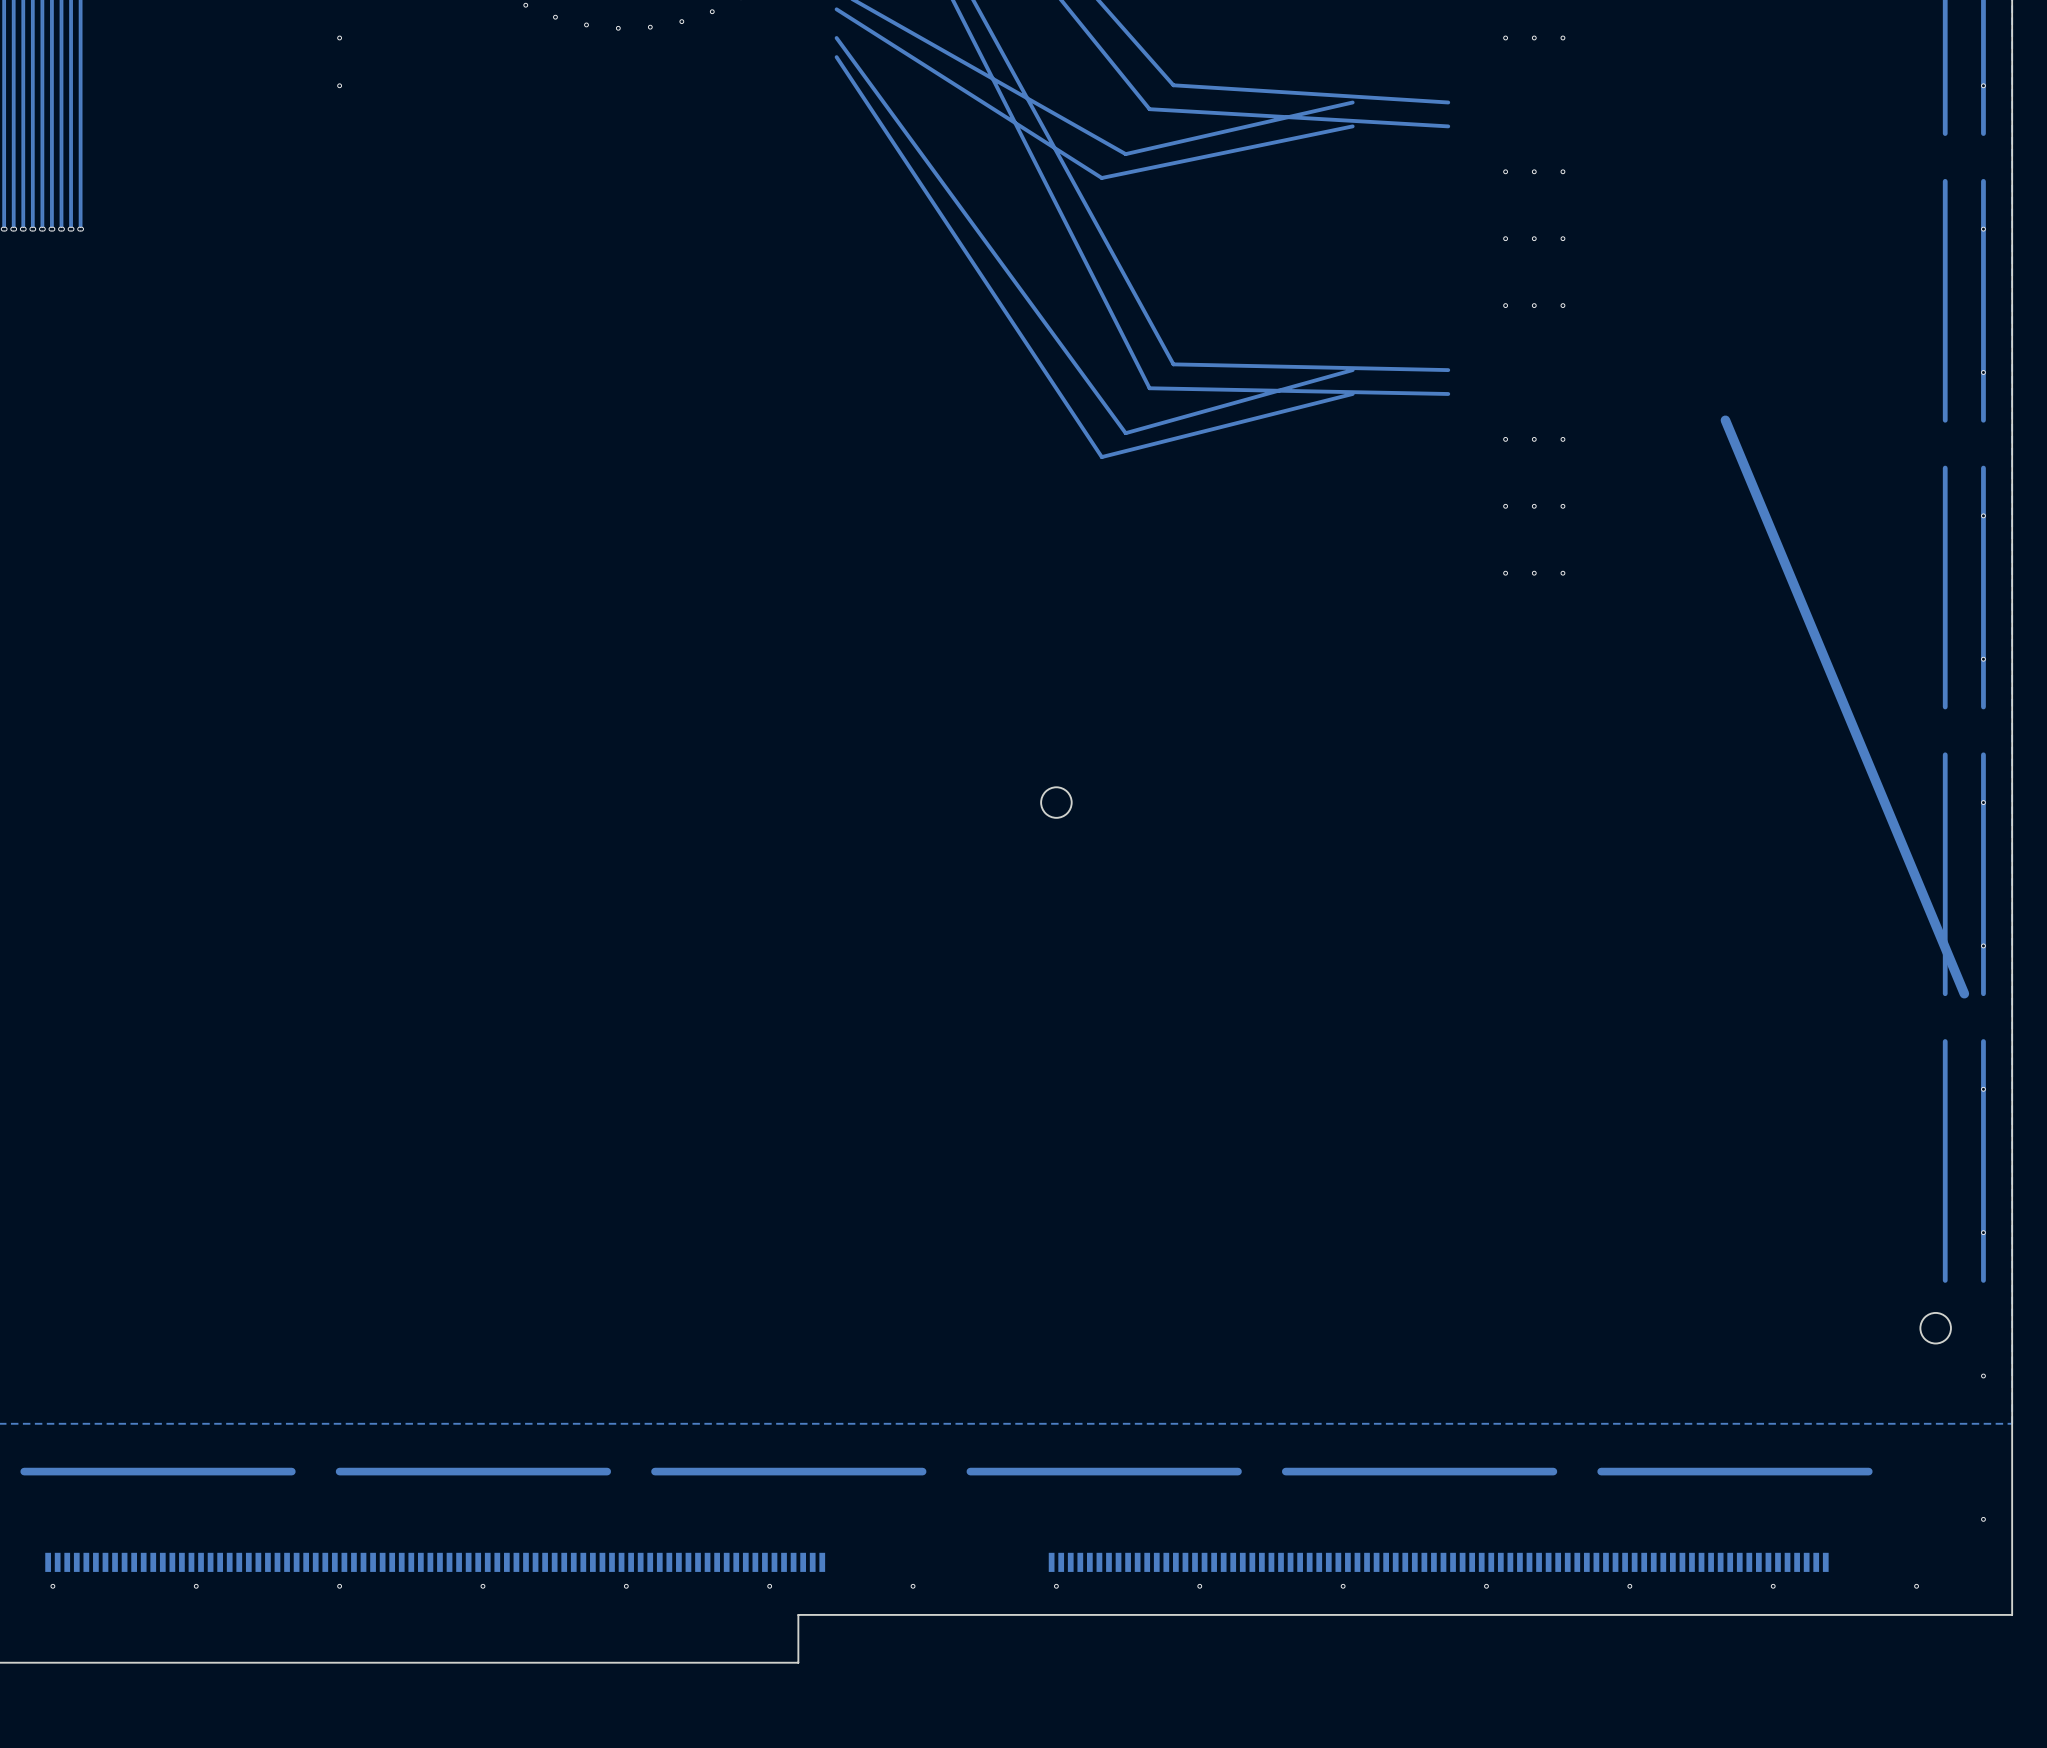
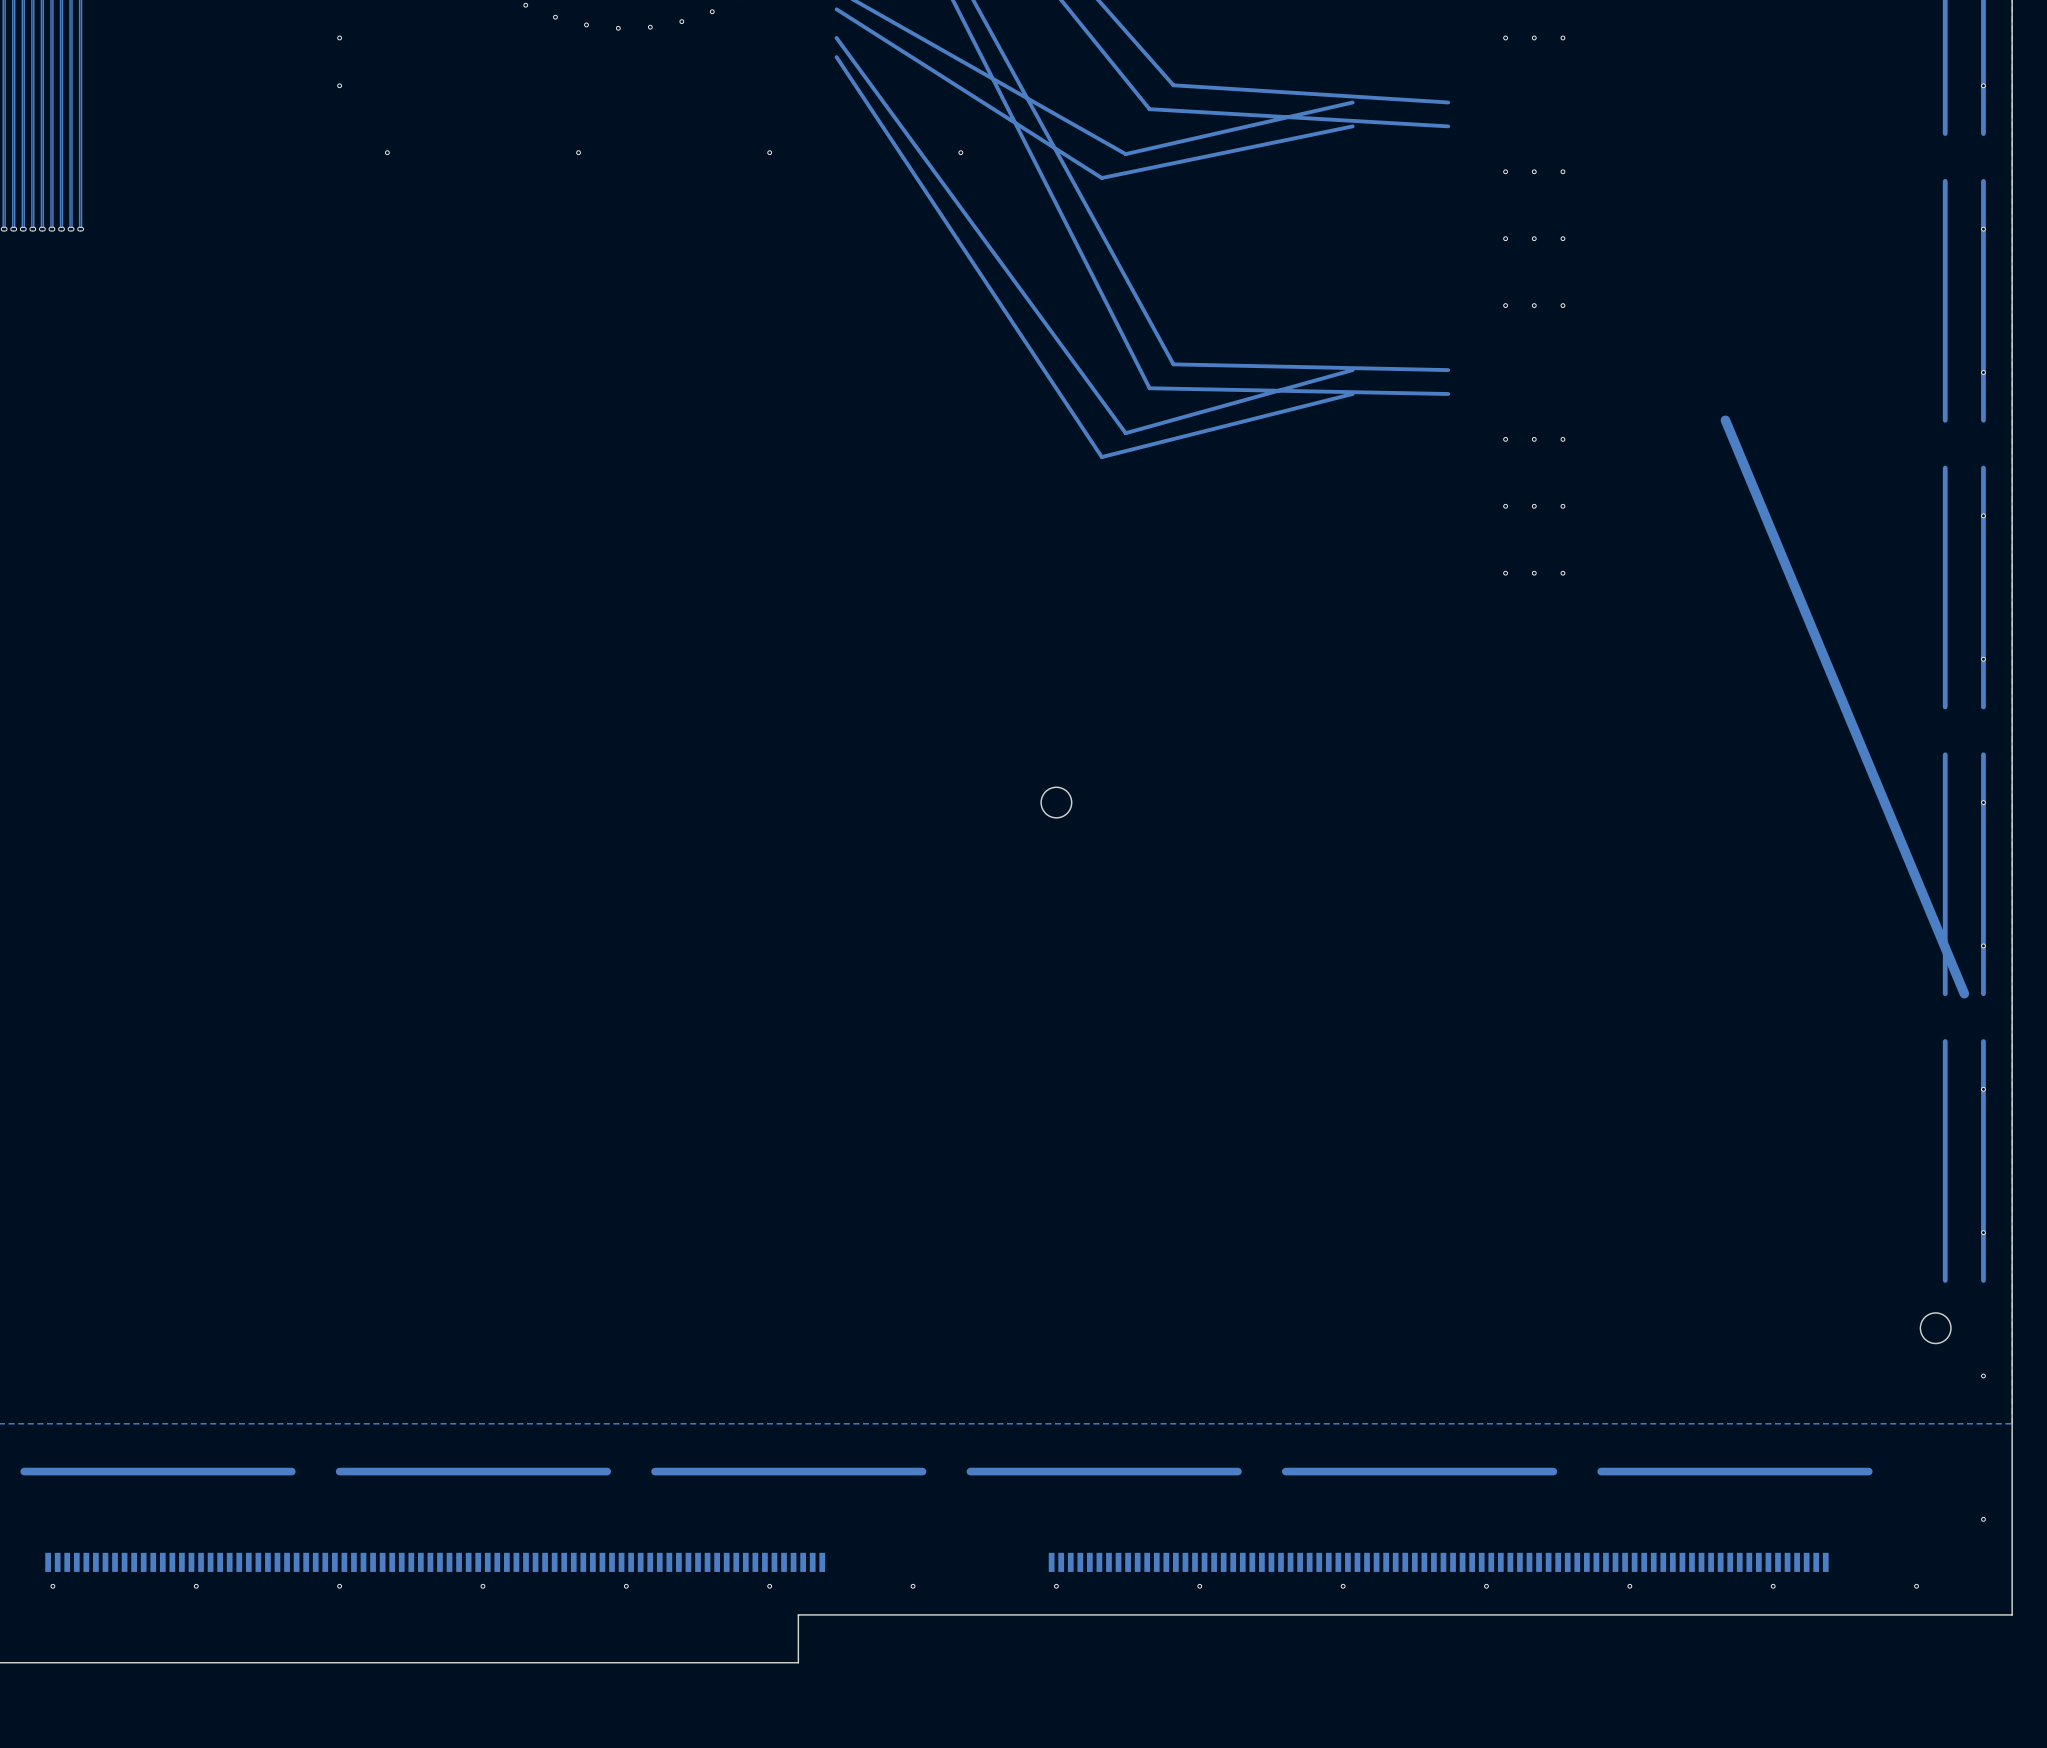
via: none -> (387, 152)
via: none -> (578, 152)
via: none -> (769, 152)
via: none -> (960, 152)

